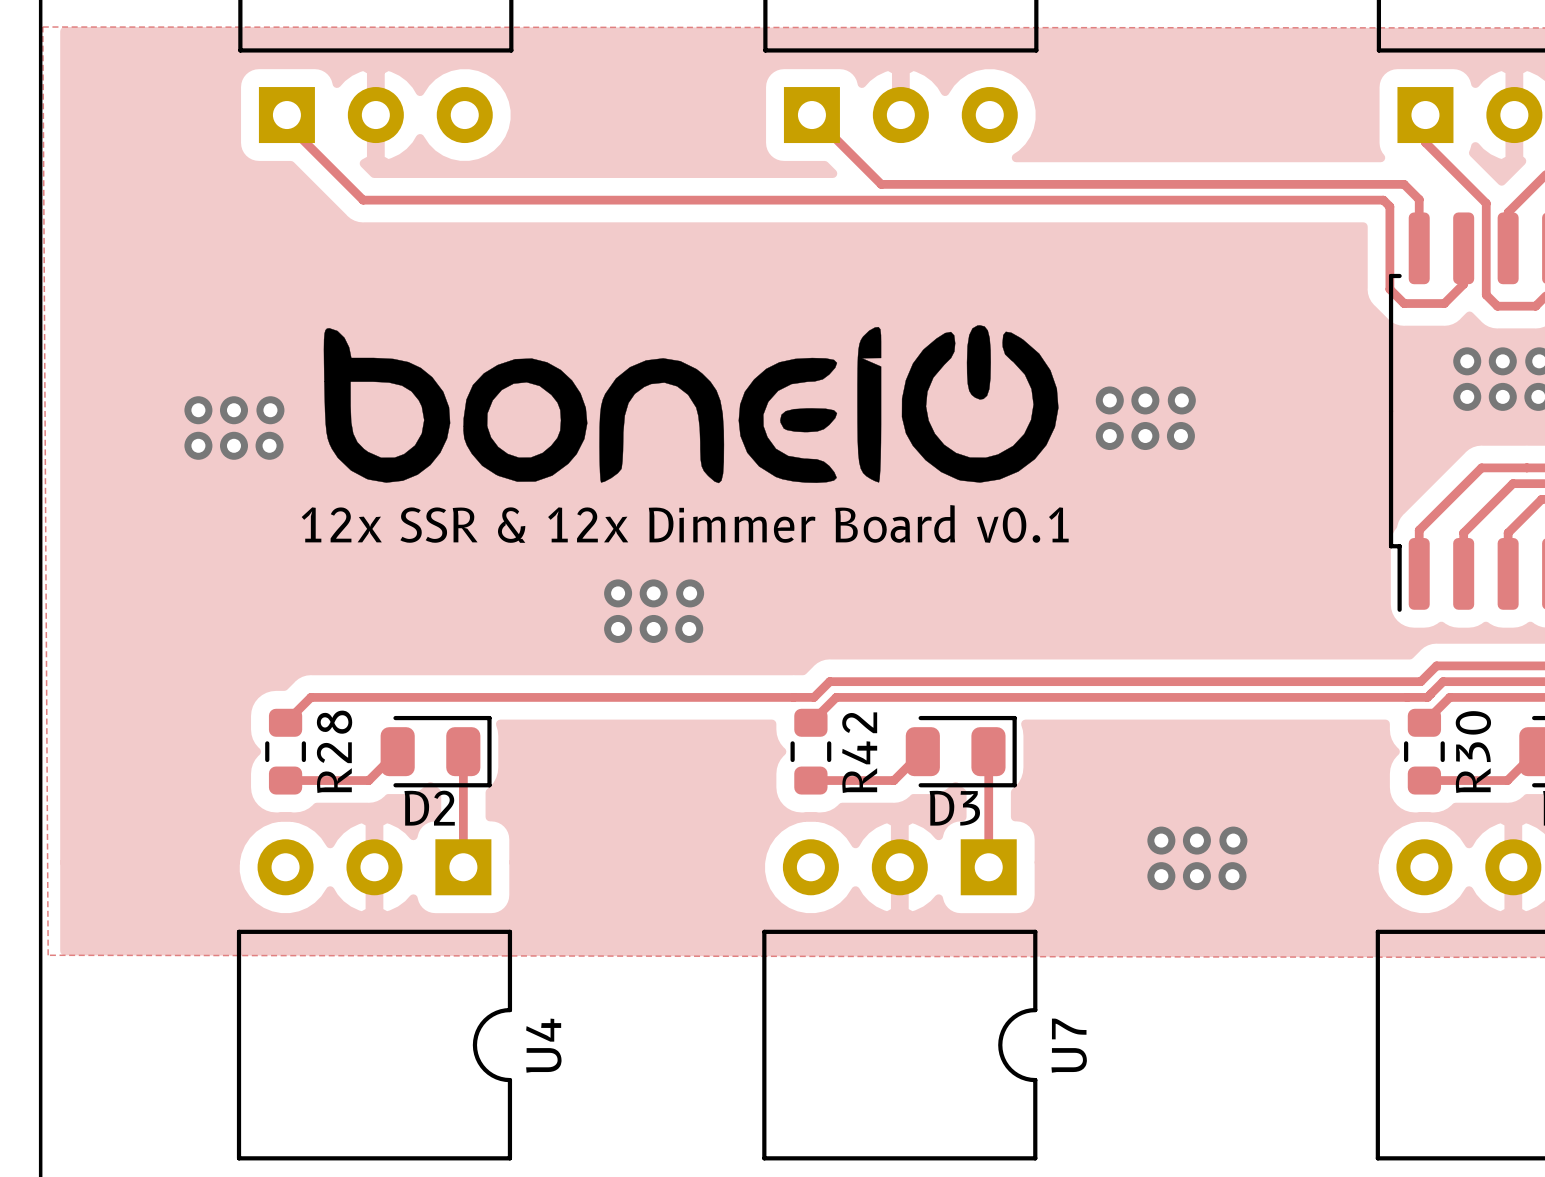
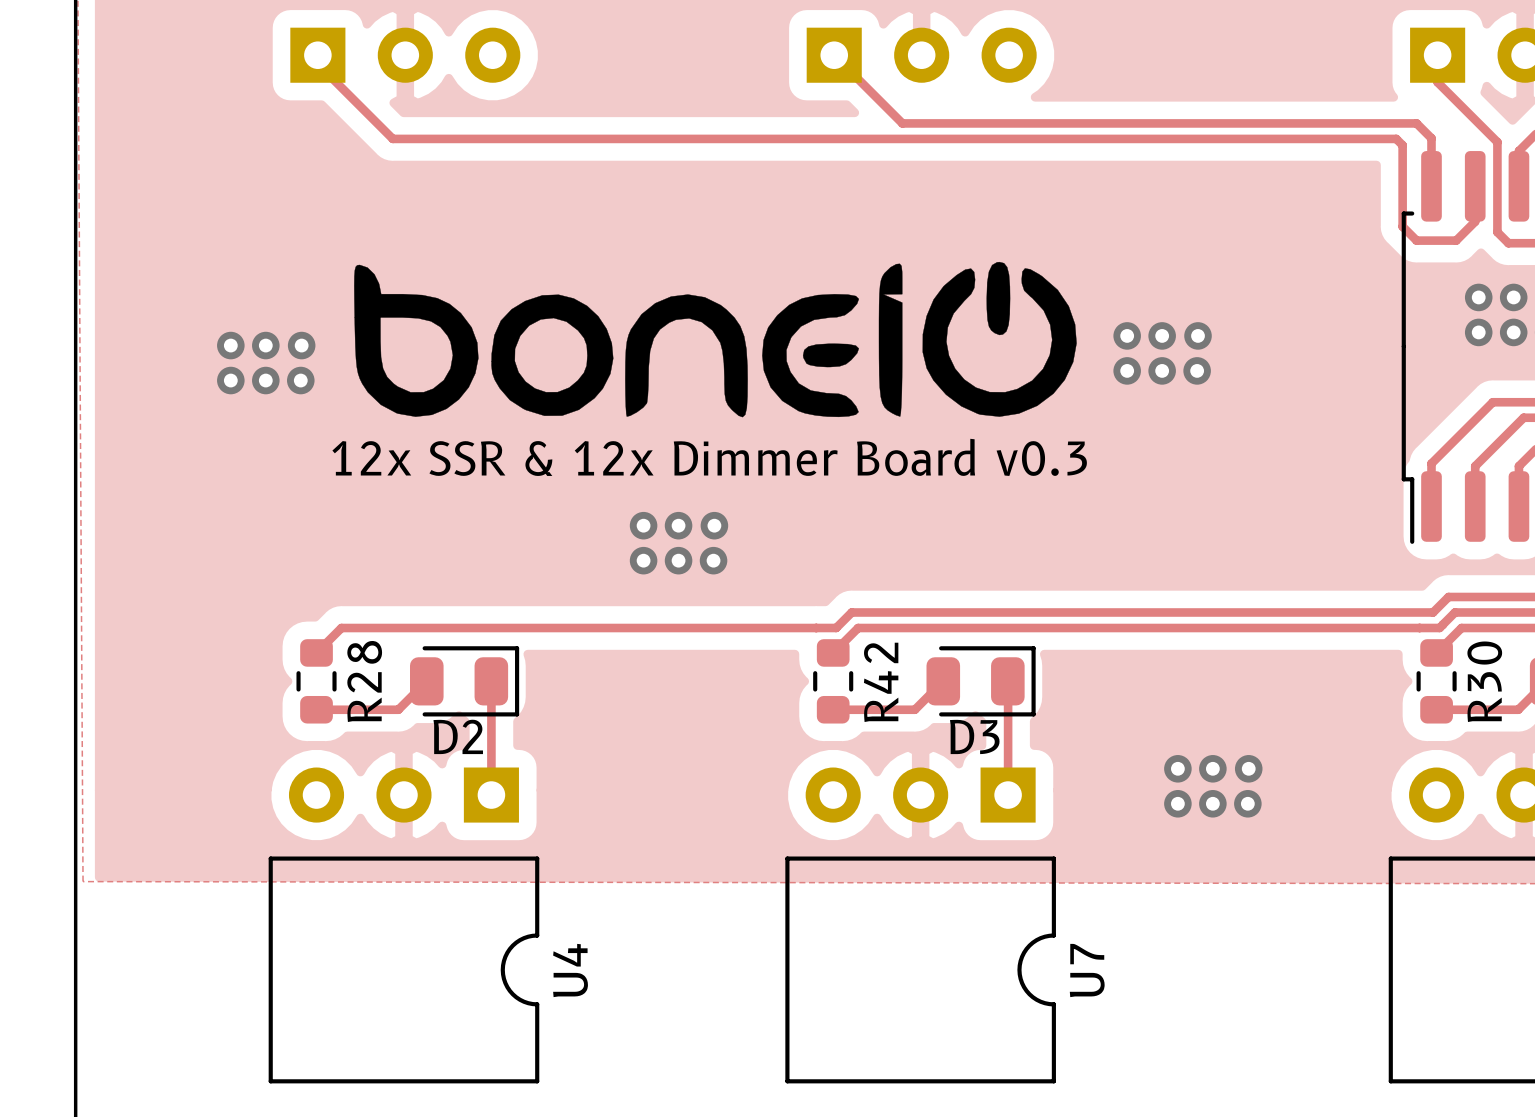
text: 12x SSR & 12x Dimmer Board v0.1 (685, 523) -> 12x SSR & 12x Dimmer Board v0.3 (709, 457)

